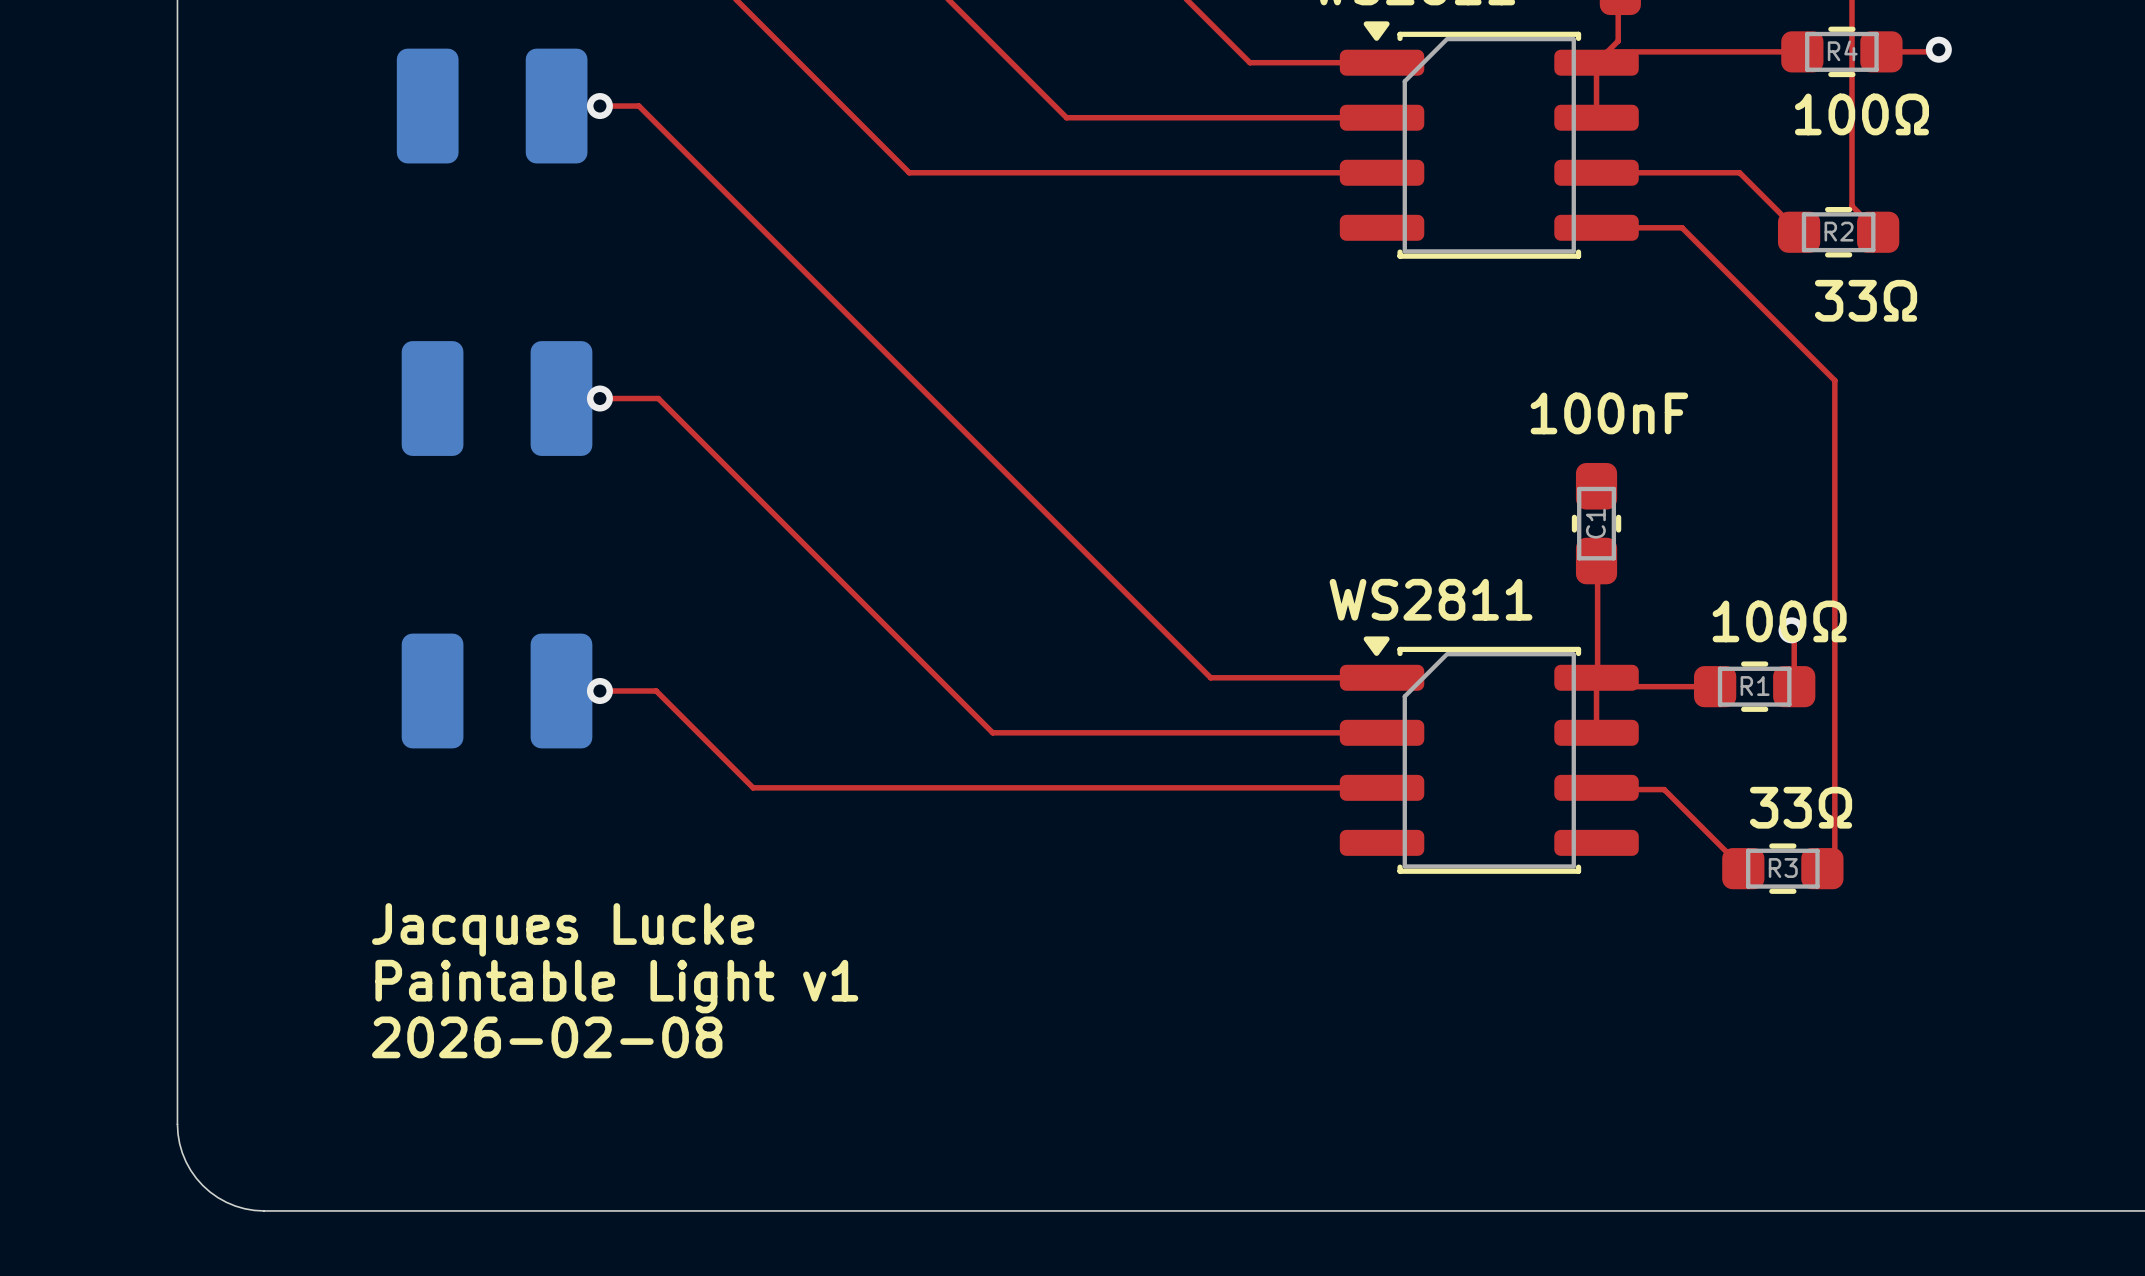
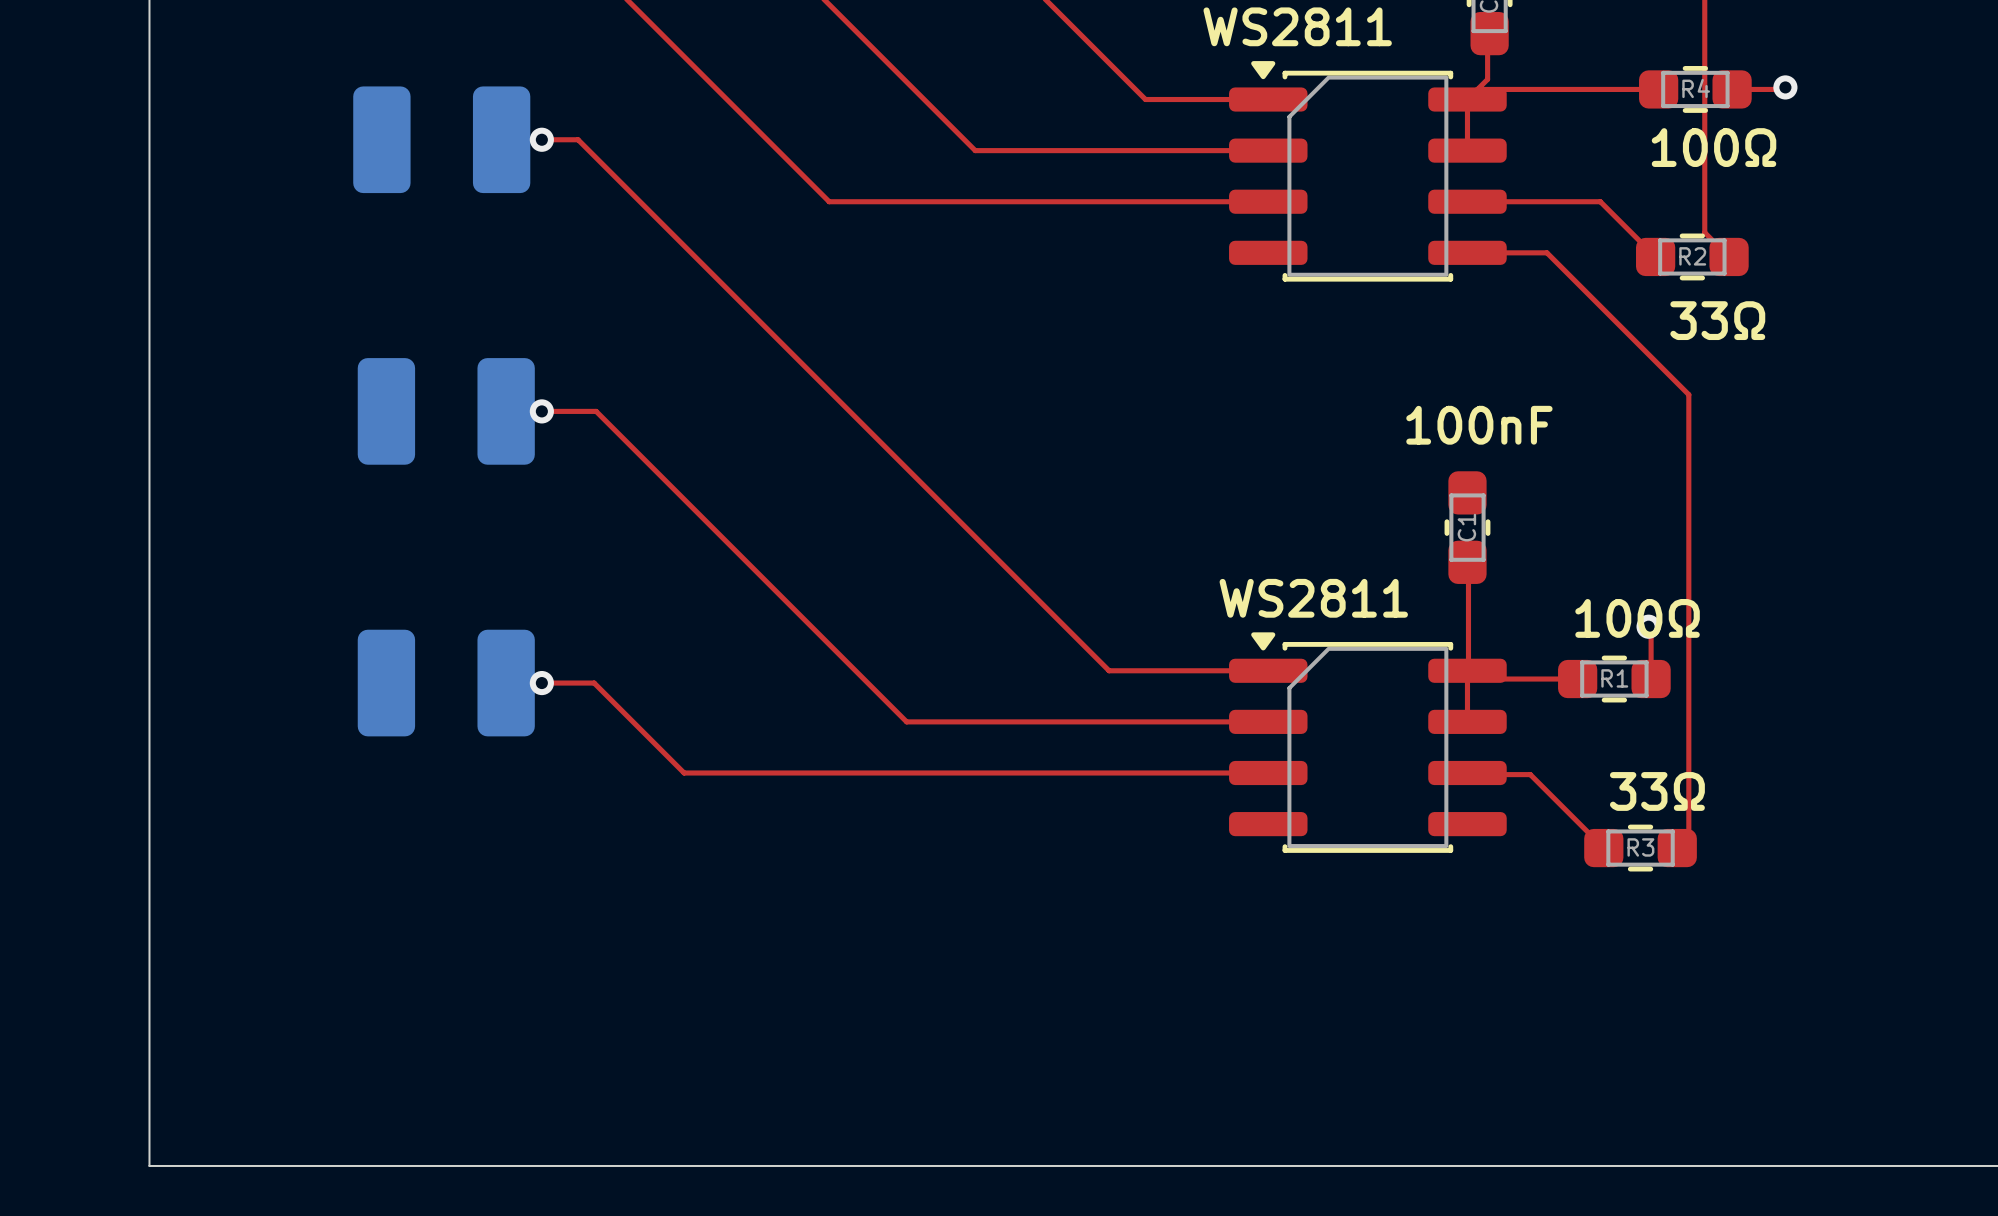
text: Jacques Lucke (563, 929) -> none
text: Paintable Light v1 (616, 986) -> none
text: 2026-02-08 (547, 1037) -> none
board edge: (177, 1124) (182, 1152) (190, 1170) (202, 1185) (226, 1202) (244, 1208) (264, 1210) -> (149, 1085) (149, 1165) (229, 1165)

